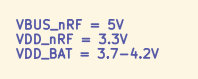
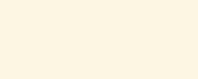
text: VBUS_nRF = 5V (69, 24) -> none
text: VDD_nRF = 3.3V (71, 39) -> none
text: VDD_BAT = 3.7-4.2V (87, 53) -> none

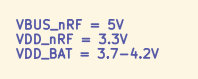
text: none -> VBUS_nRF = 5V (69, 24)
text: none -> VDD_nRF = 3.3V (71, 39)
text: none -> VDD_BAT = 3.7-4.2V (87, 53)

